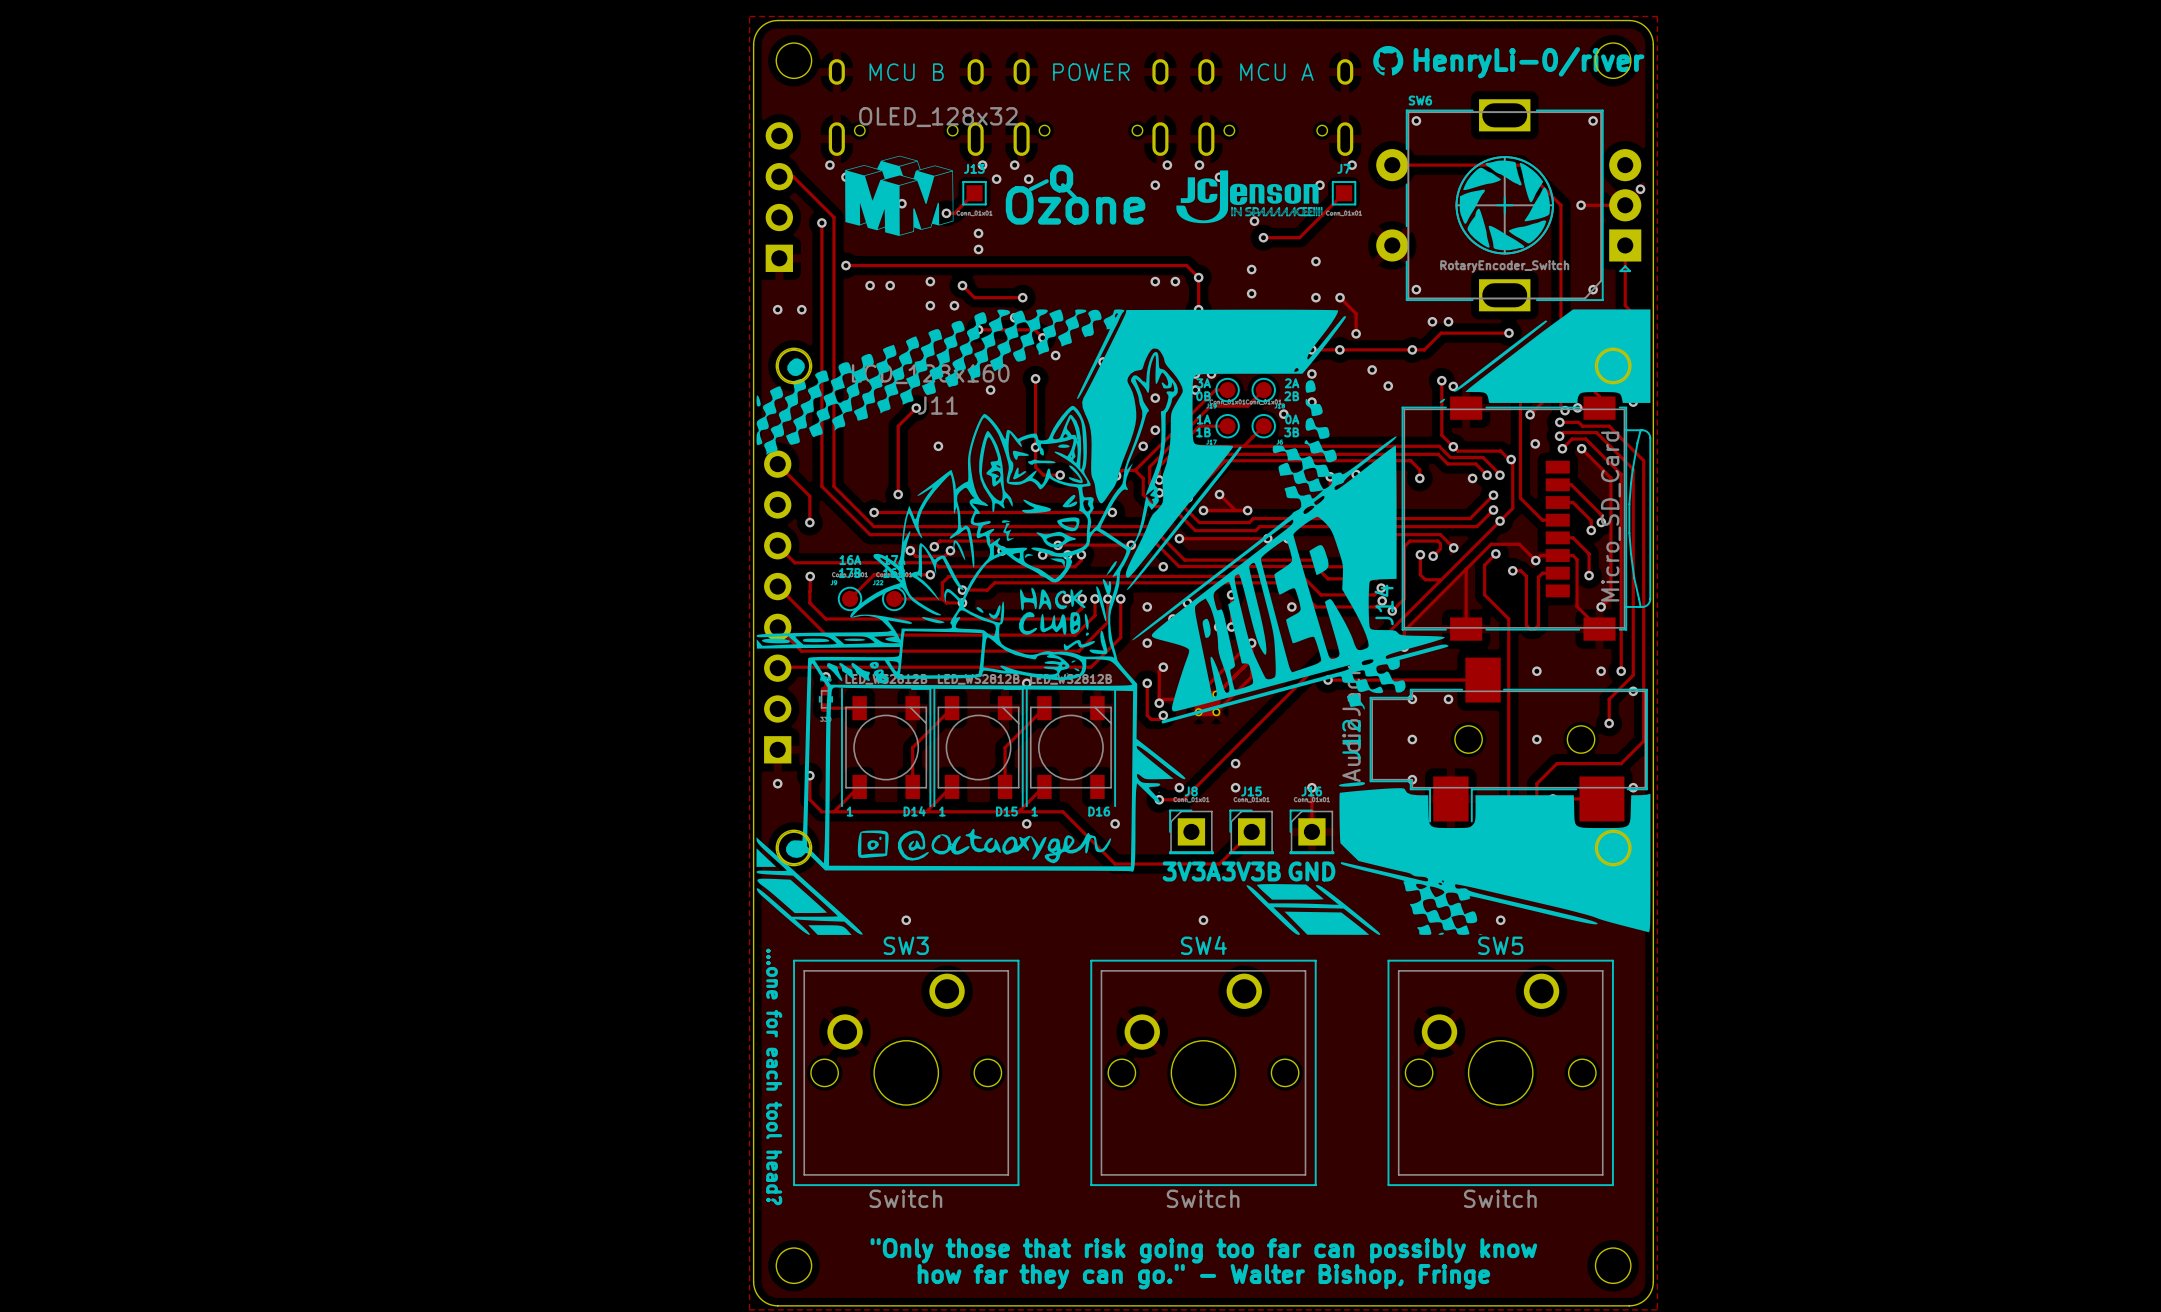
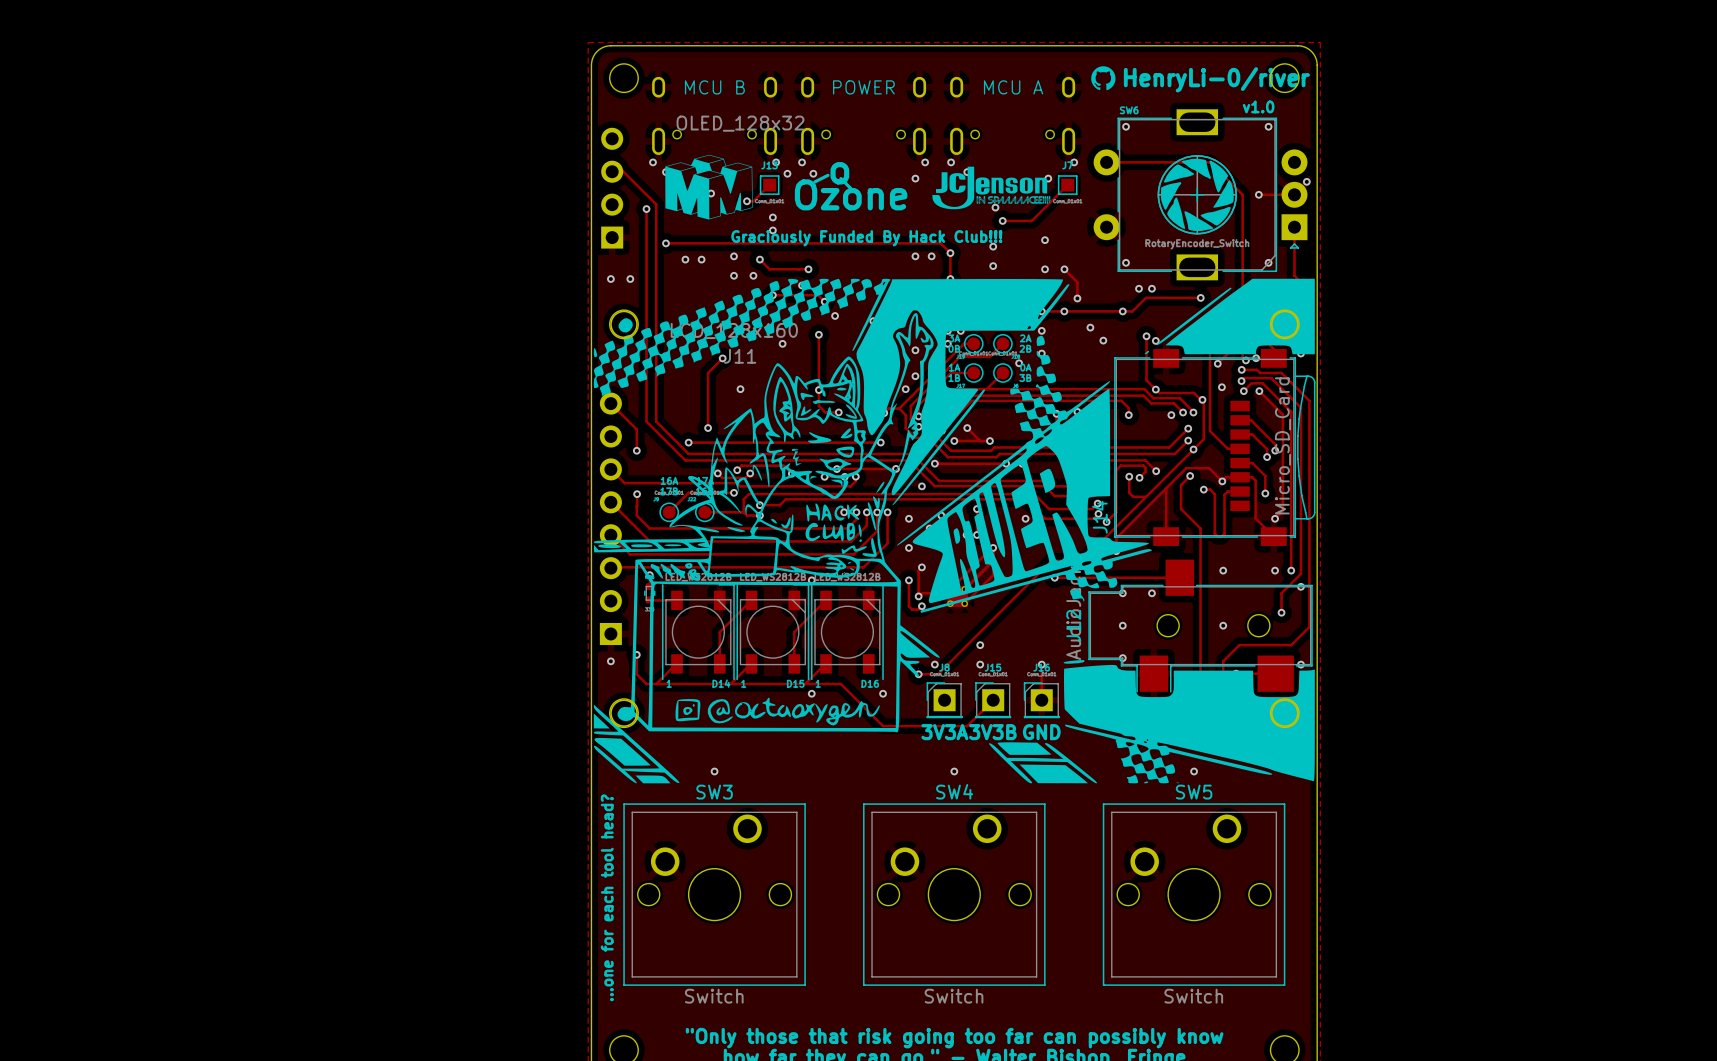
text: none -> v1.0 (1258, 106)
text: none -> Graciously Funded By Hack Club!!! (866, 238)
text rotation: 0° (774, 1076) -> 180° (607, 897)

